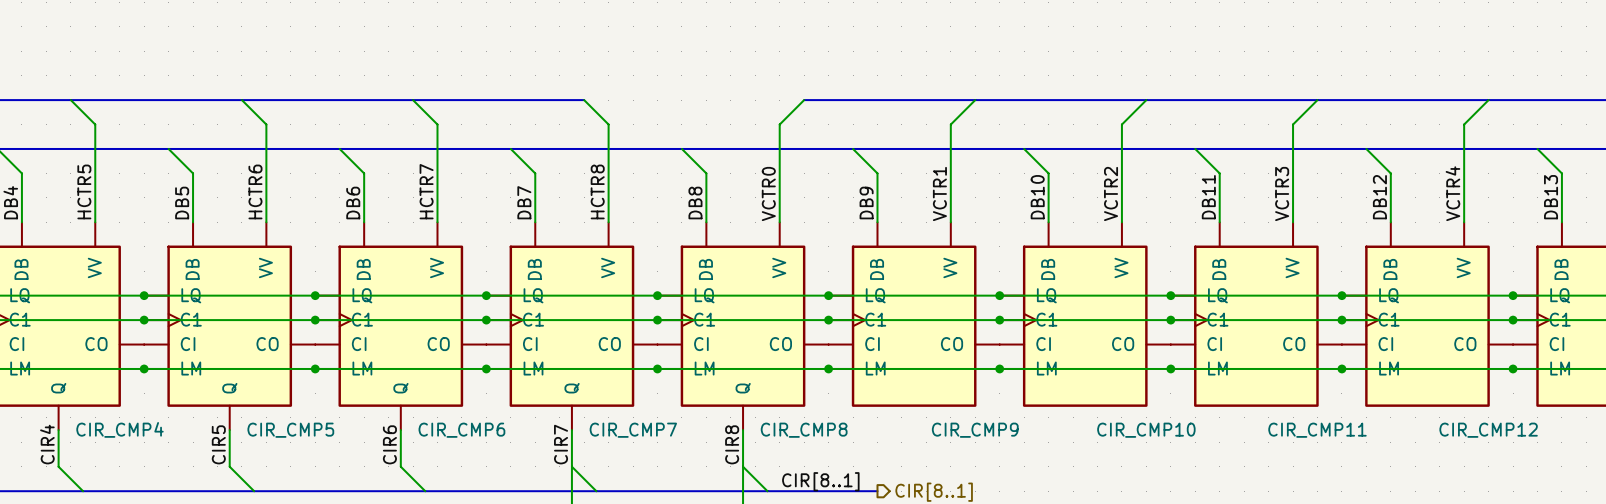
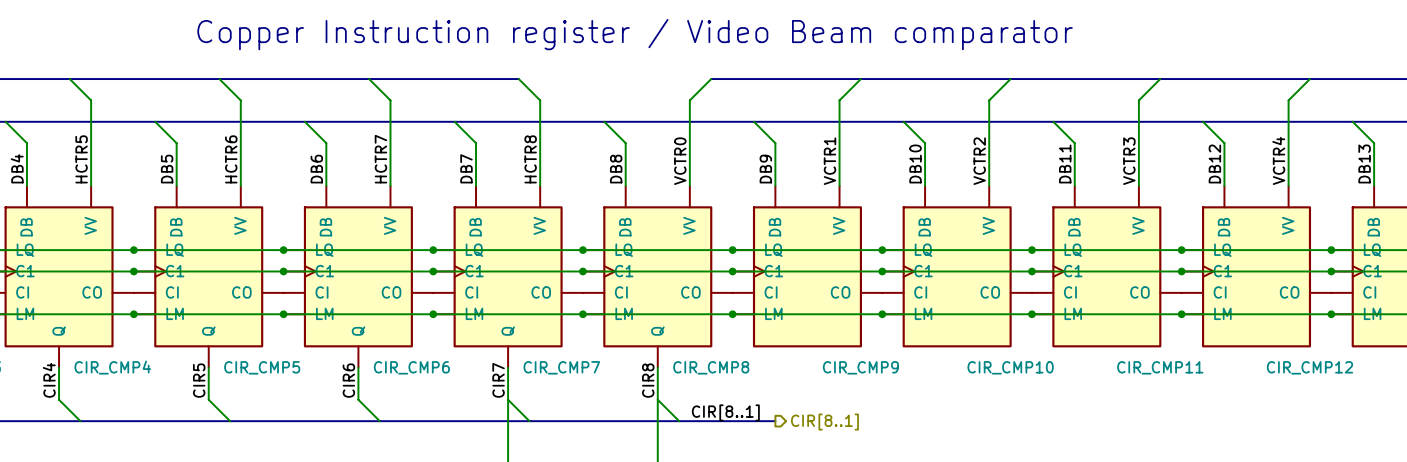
text: none -> Copper Instruction register / Video Beam comparator (635, 34)

